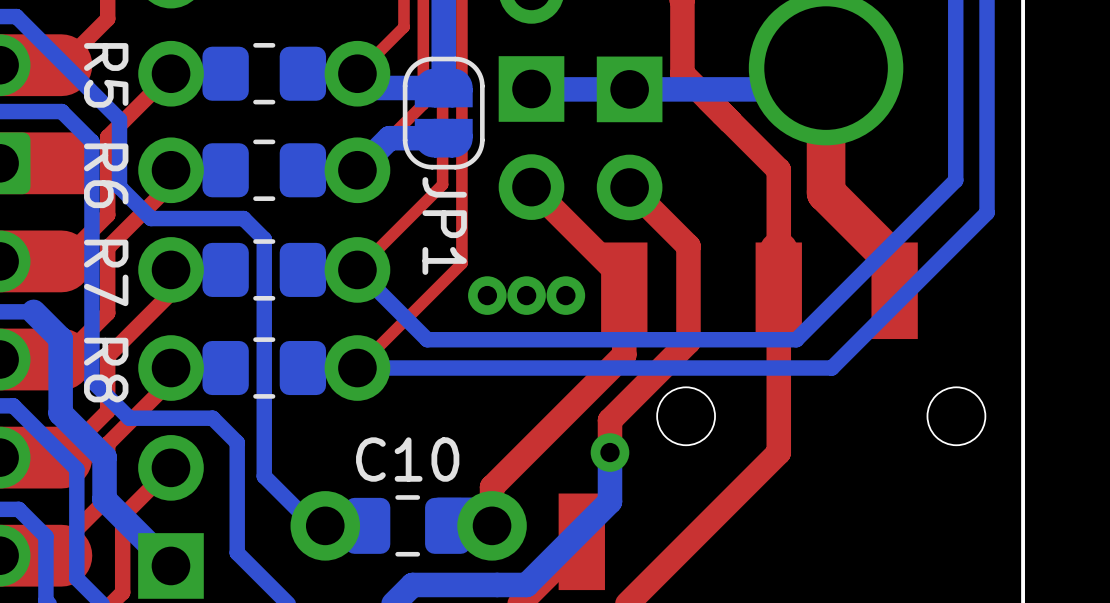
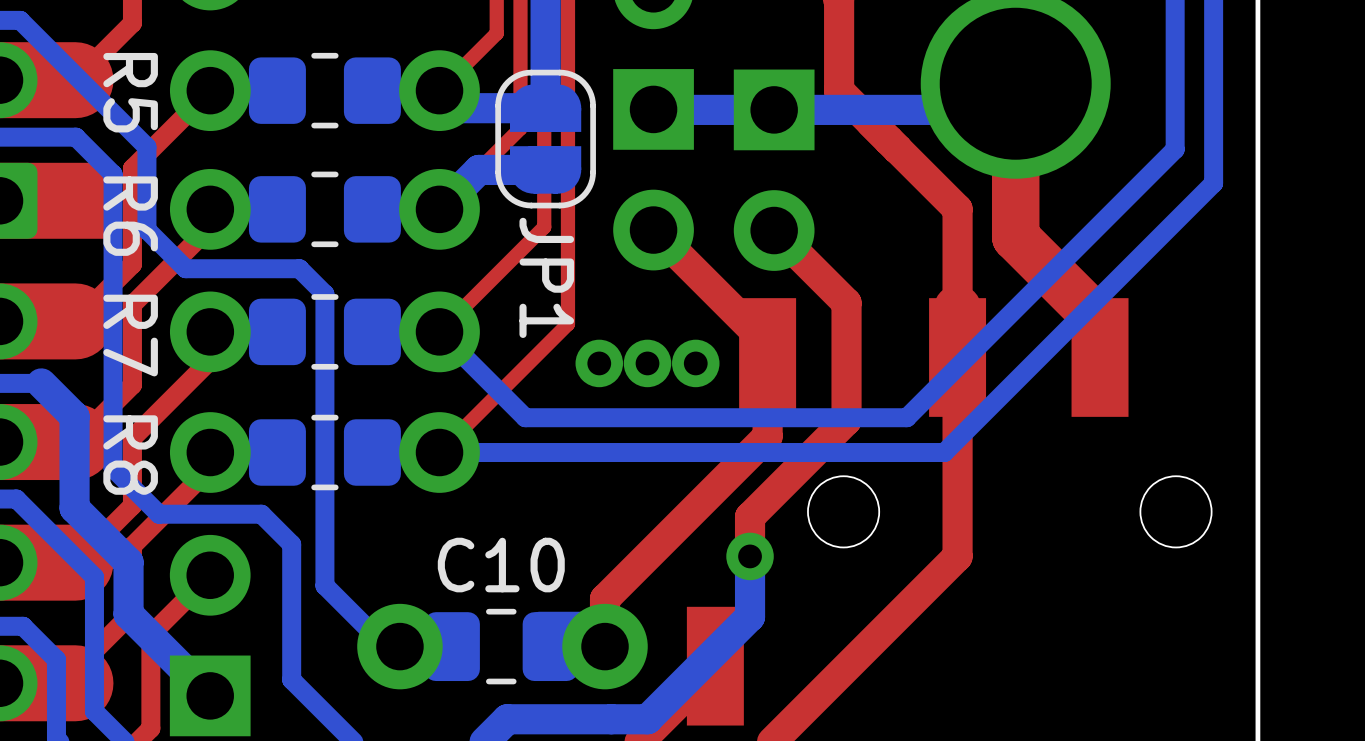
bottom track: (955, 121) (955, 180) -> (1213, 183) (1175, 221)
bottom track: none -> (1175, 149) (906, 417)
bottom track: (987, 149) (987, 212) (831, 368) (768, 368) -> none
bottom track: (796, 339) (737, 339) -> (979, 417) (944, 452)

